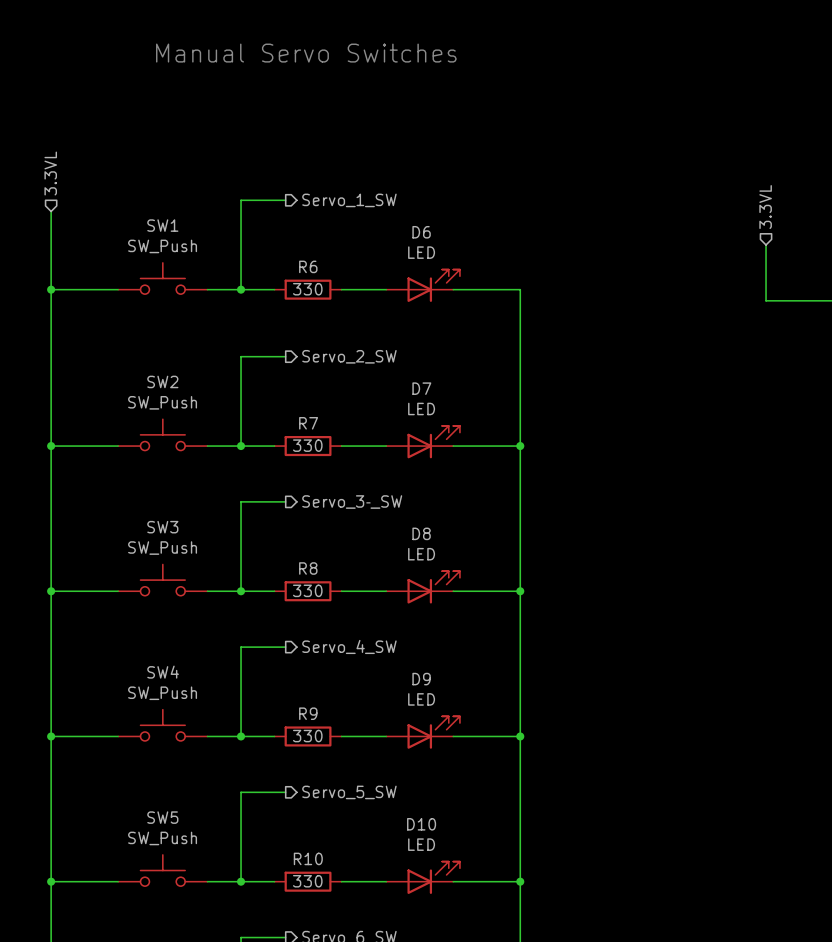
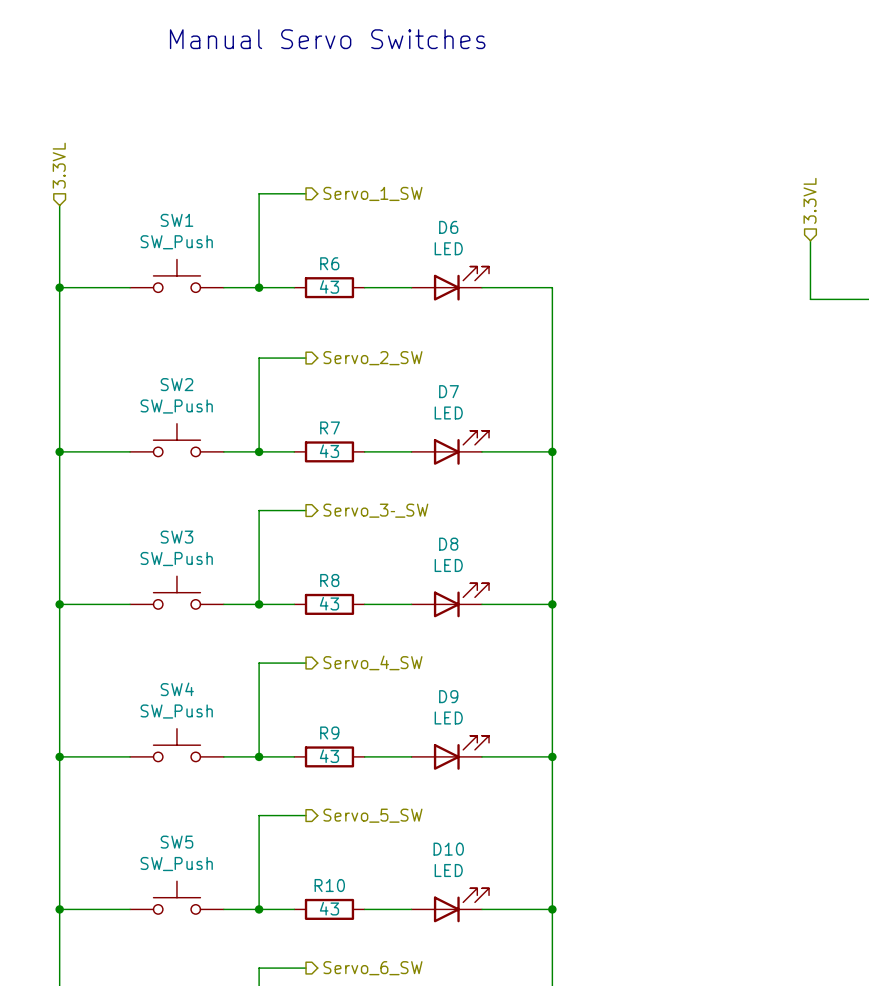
R6 value: 330 (307, 289) -> 43 (329, 286)
R7 value: 330 (307, 445) -> 43 (329, 451)
R8 value: 330 (307, 590) -> 43 (329, 603)
R9 value: 330 (307, 736) -> 43 (329, 756)
R10 value: 330 (307, 881) -> 43 (329, 908)

